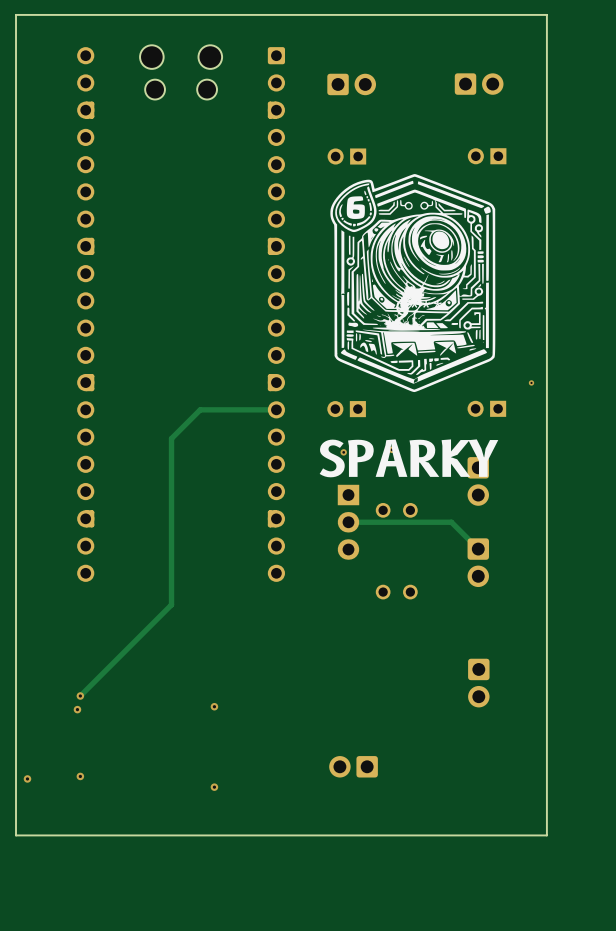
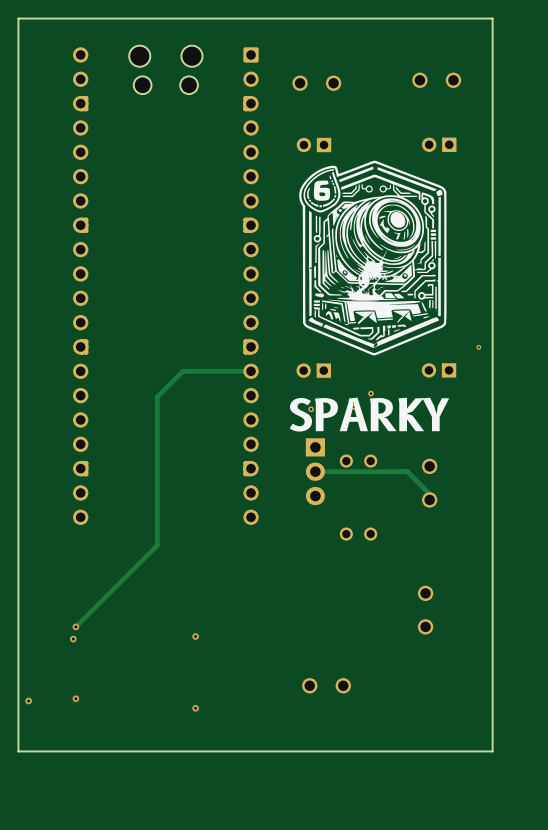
part footprint: [327, 73, 377, 96] -> [292, 75, 342, 91]
part footprint: [454, 73, 504, 95] -> [412, 72, 462, 88]
via: none -> (370, 393)
part: (478, 481) -> none
part: none -> (429, 483)
part: (478, 562) -> none
part footprint: [468, 658, 490, 708] -> [417, 585, 434, 635]
part footprint: [329, 756, 378, 778] -> [302, 678, 351, 694]

